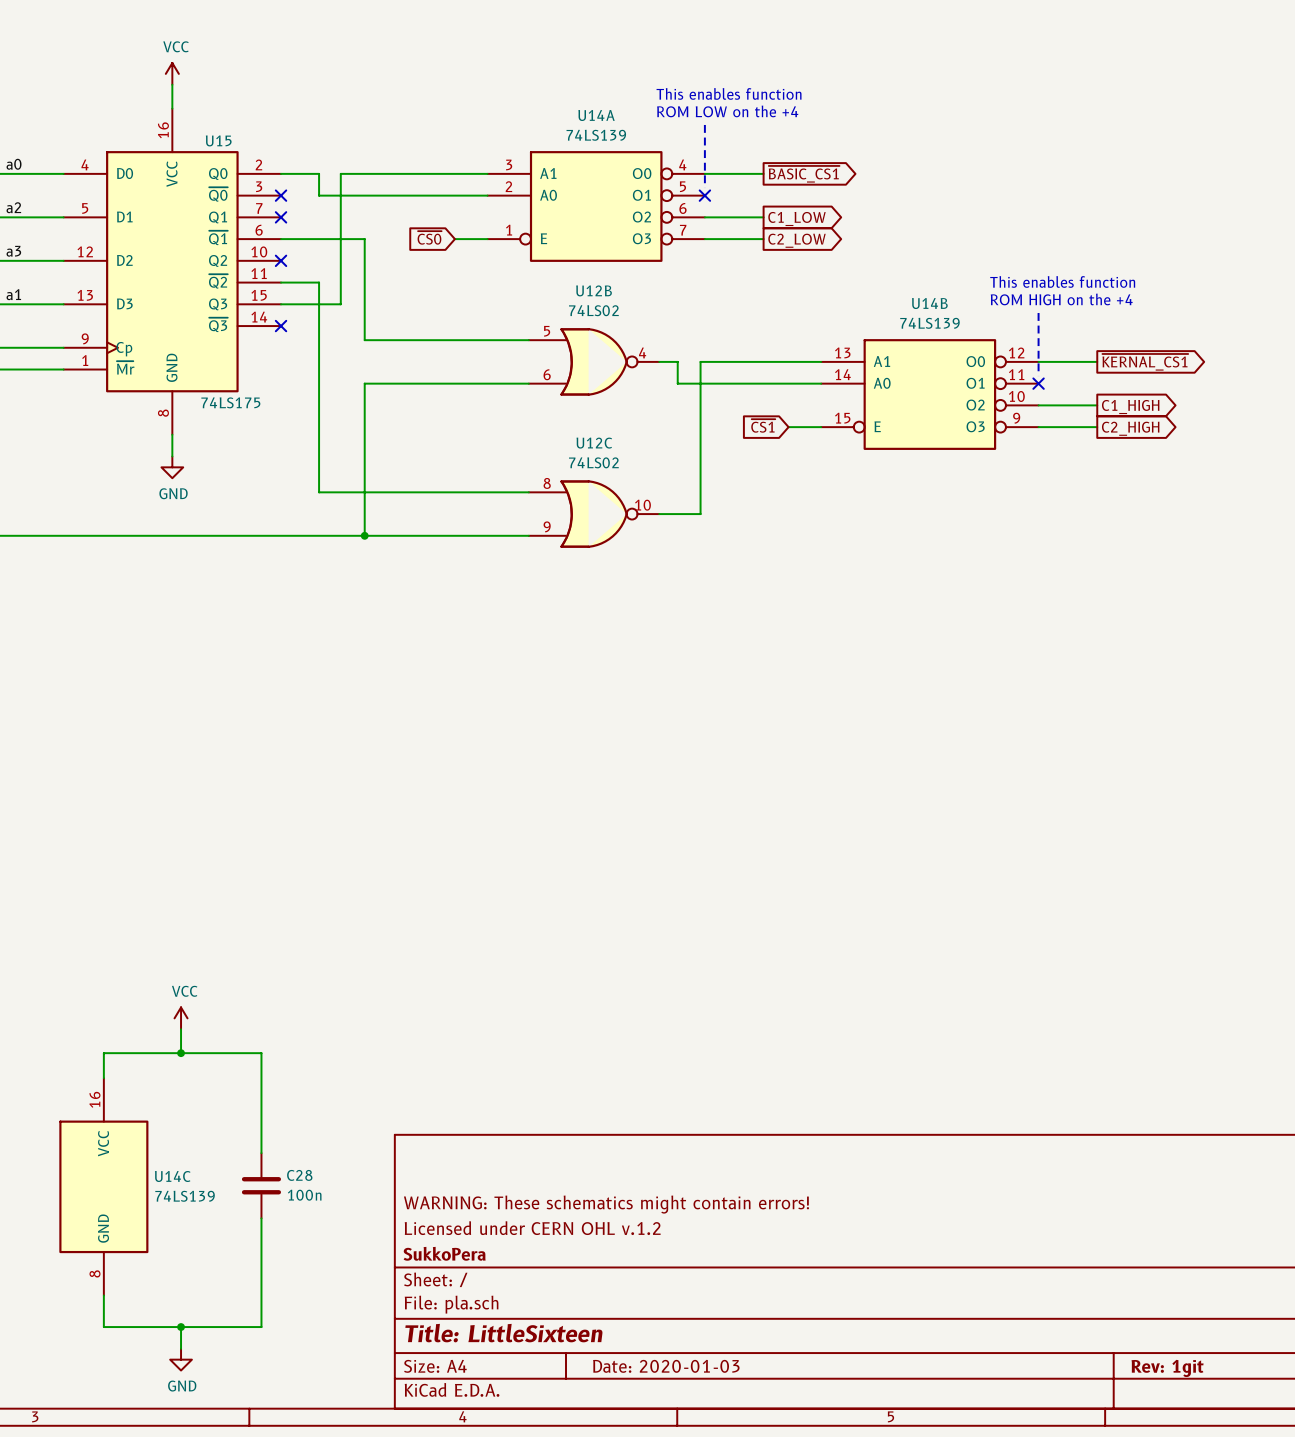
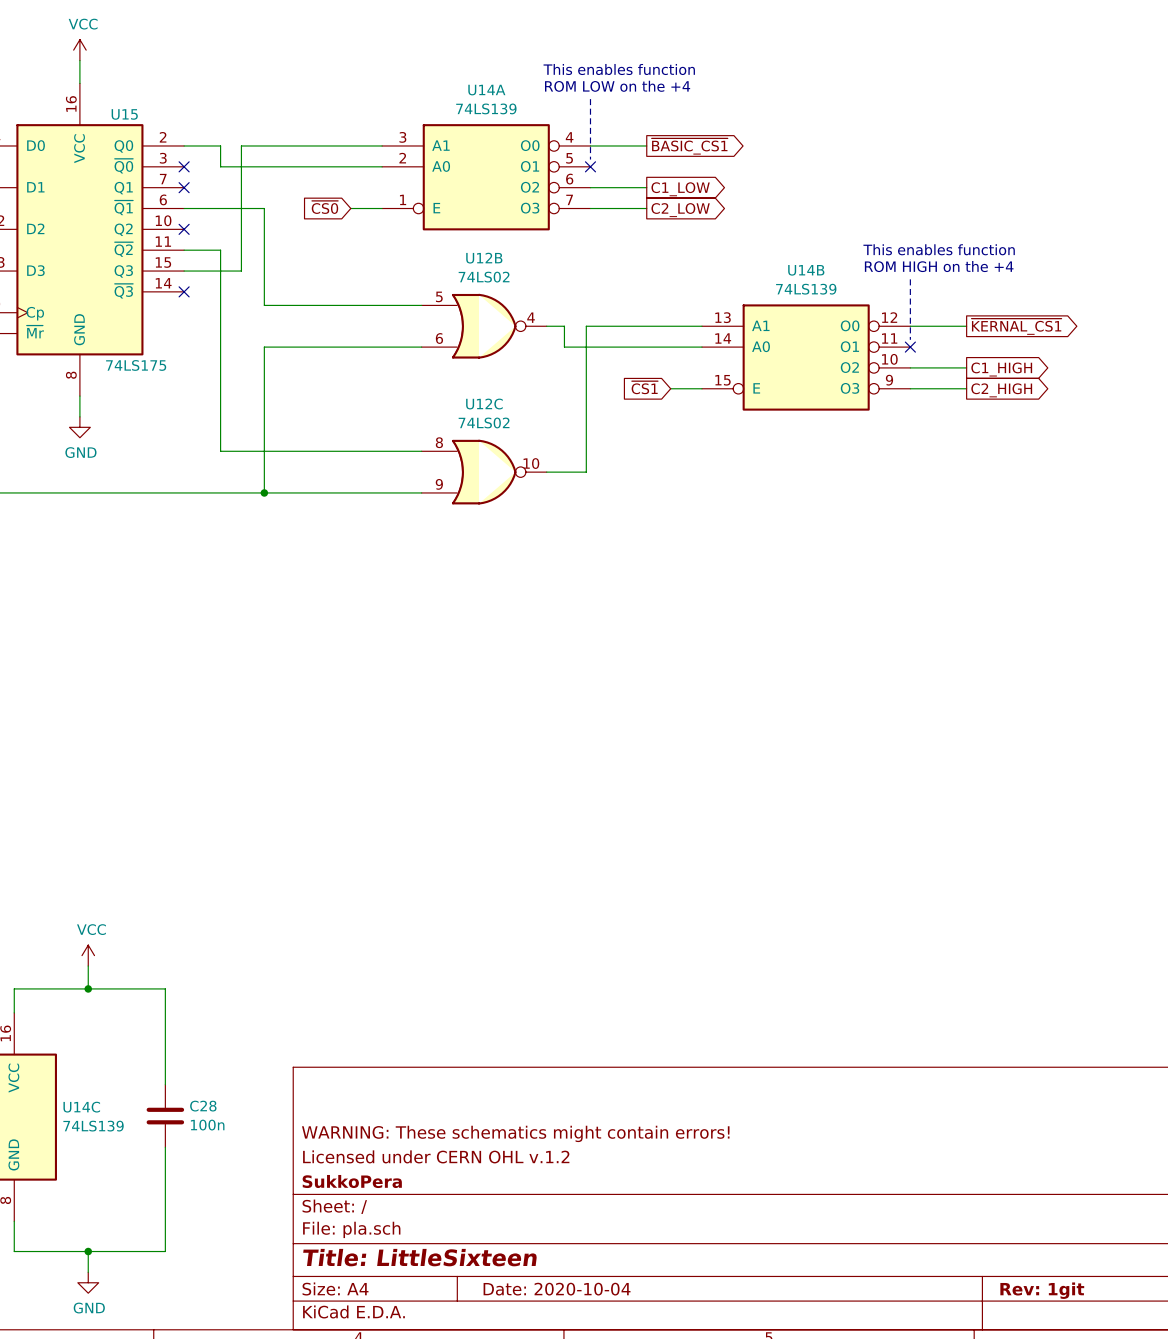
title block: Date: 2020-01-03 (666, 1366) -> Date: 2020-10-04 (557, 1289)

